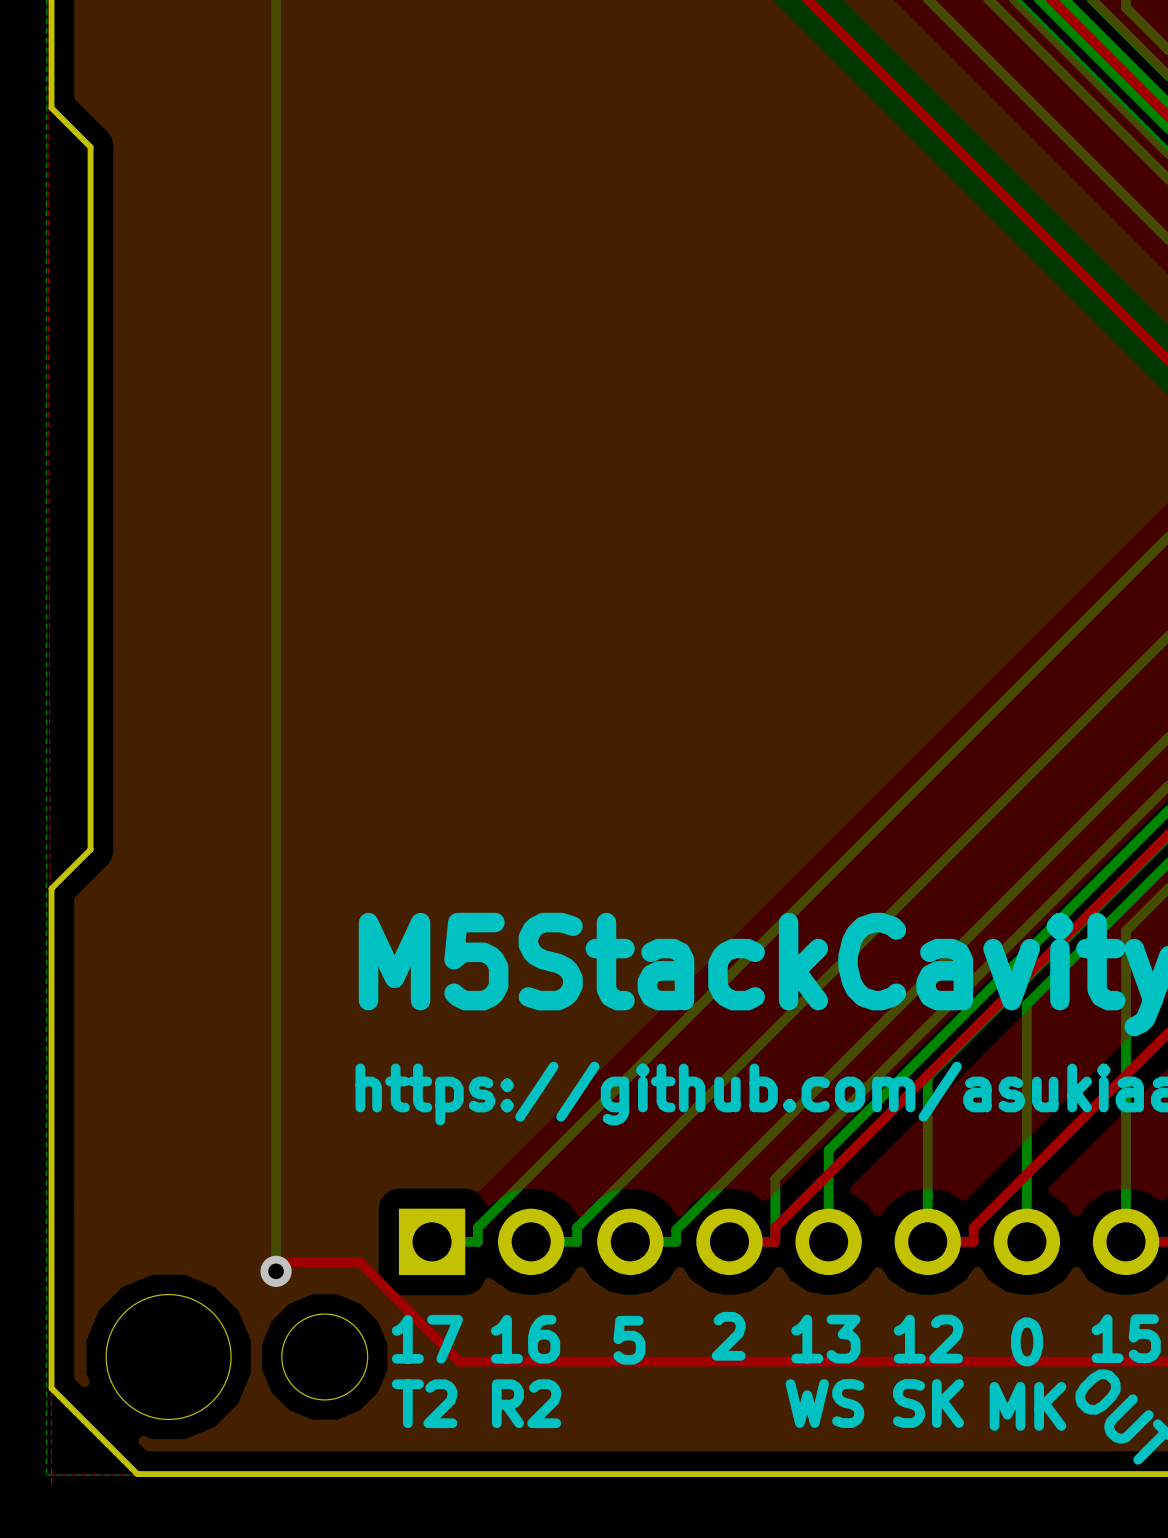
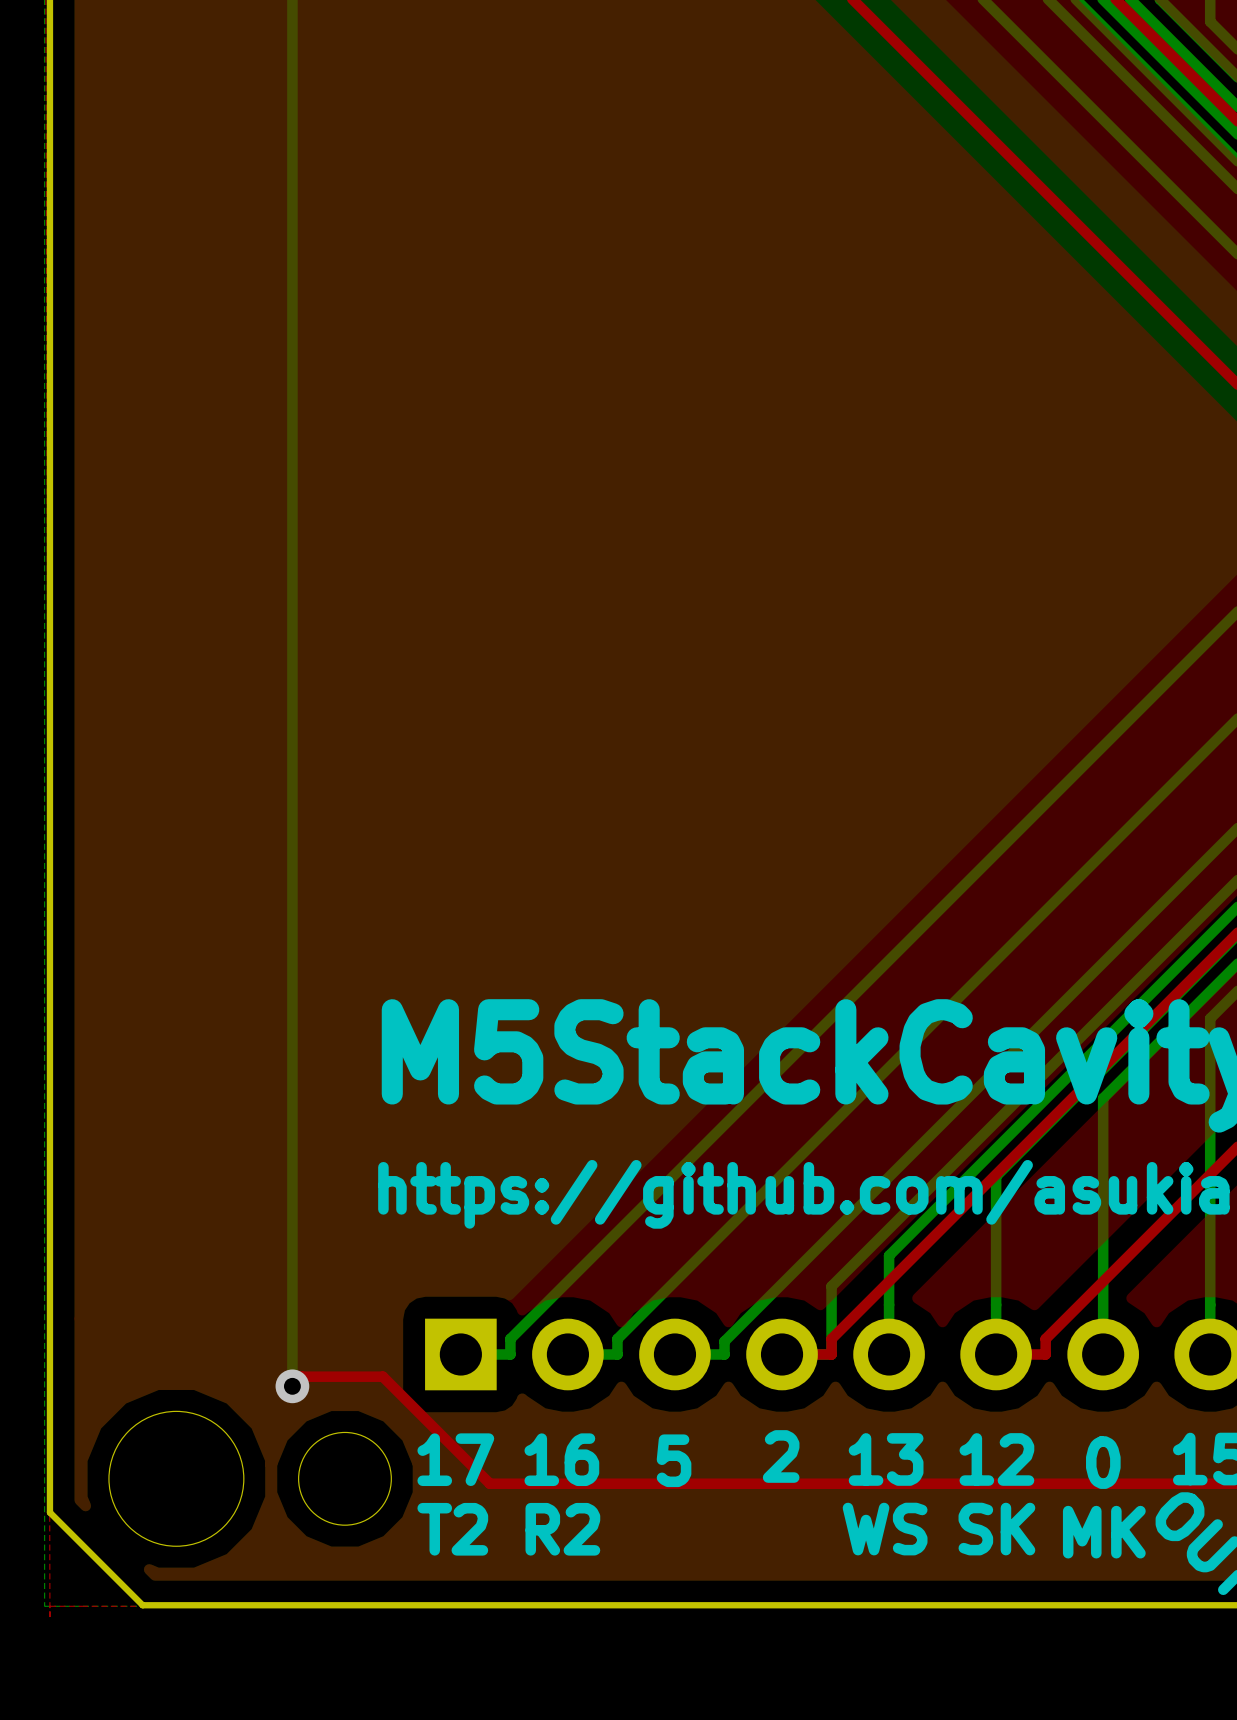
board edge: (51, 108) (90, 147) (90, 849) (51, 888) -> (49, 130) (49, 973)

